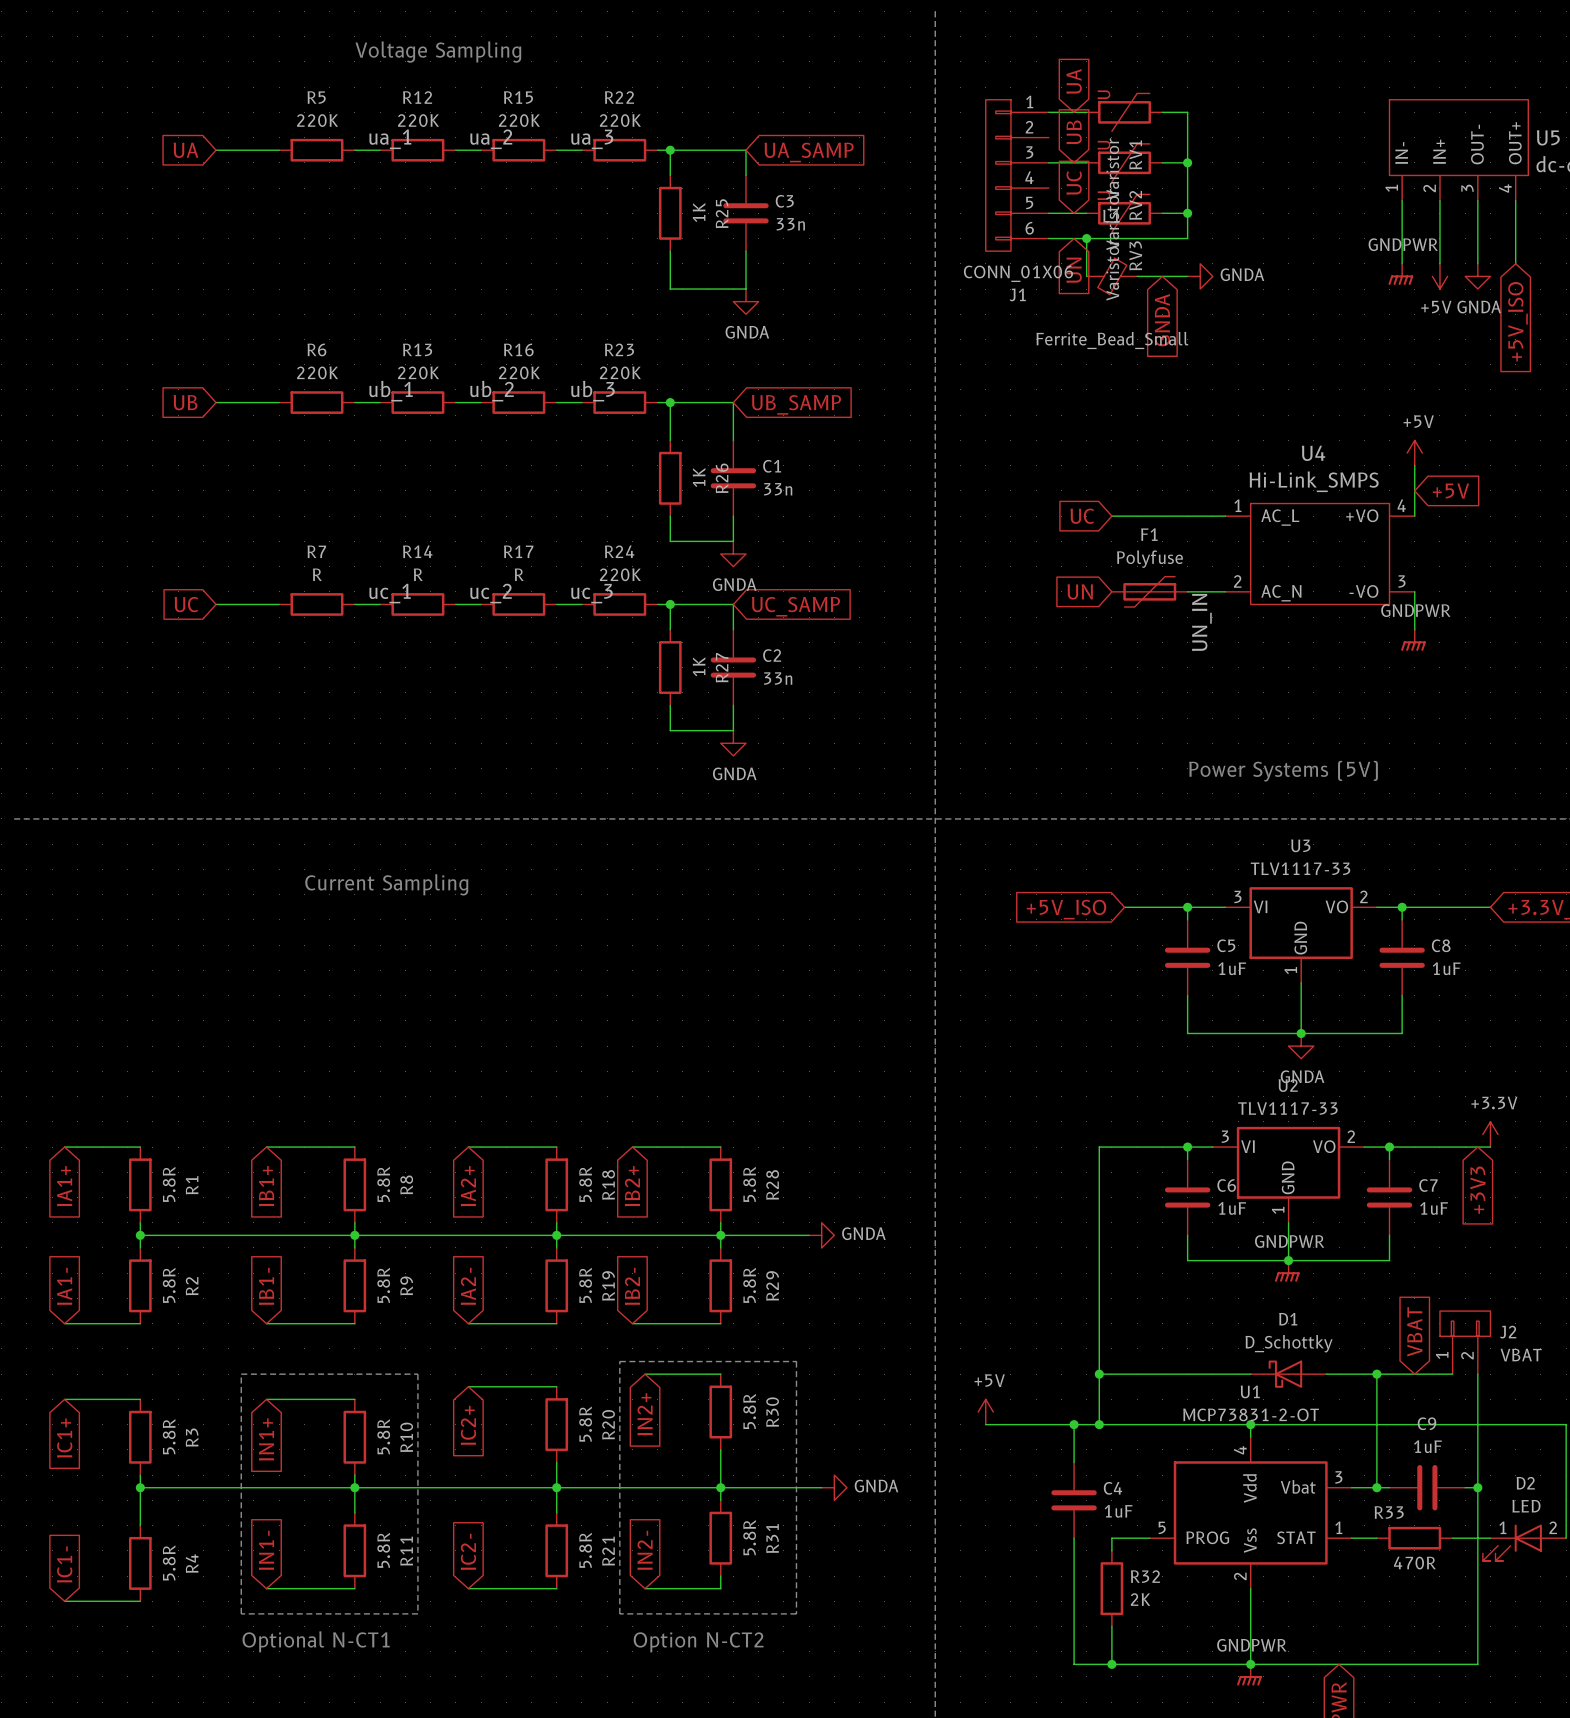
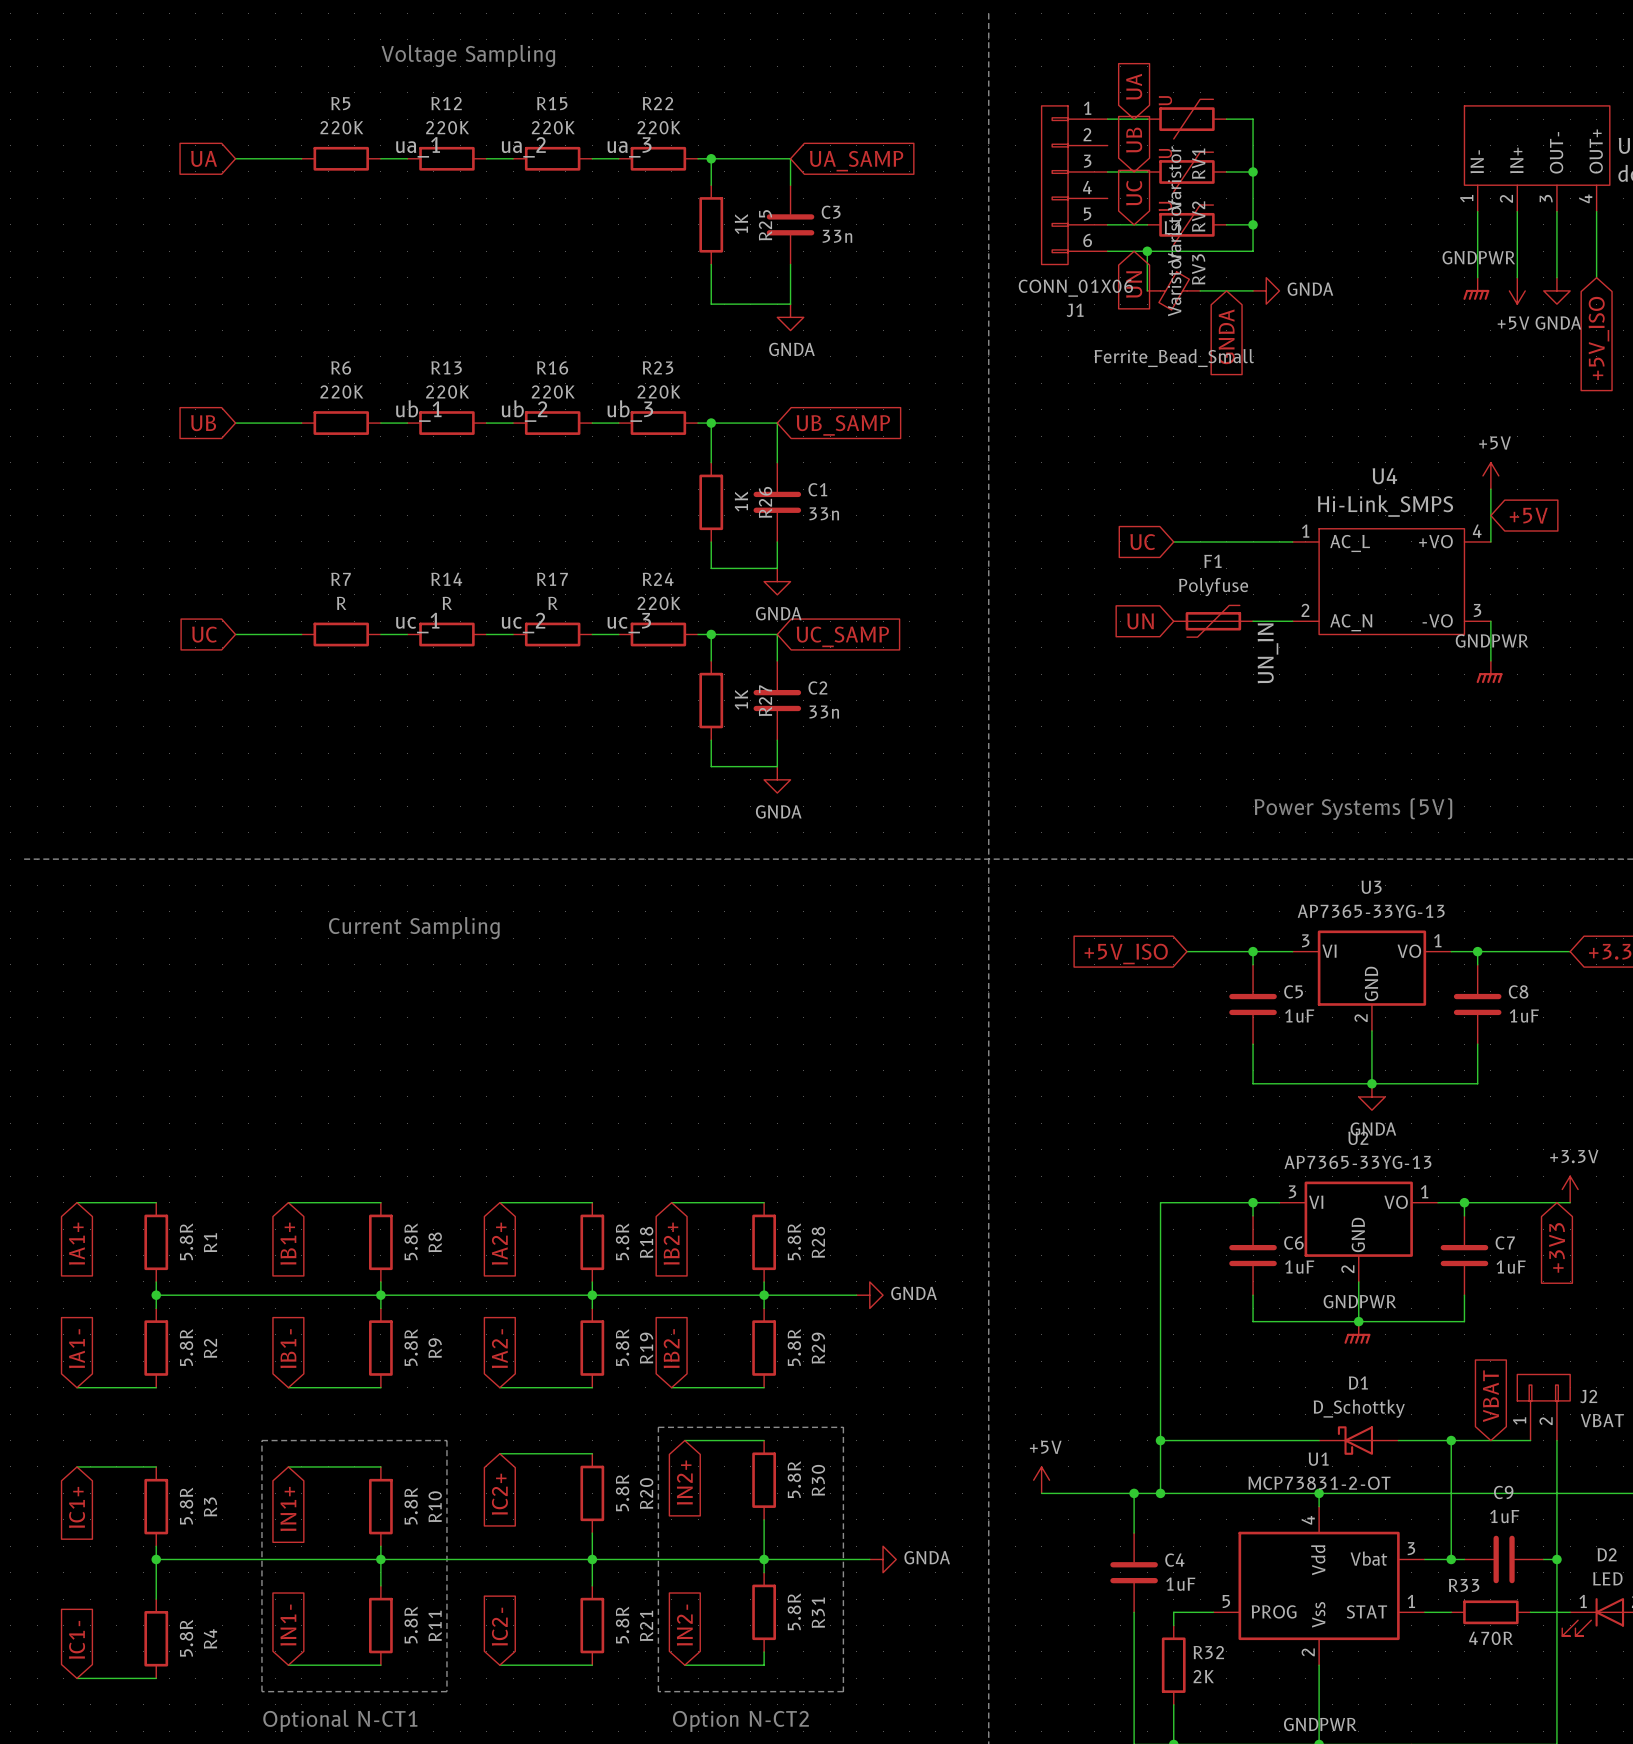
U3 value: TLV1117-33 (1300, 868) -> AP7365-33YG-13 (1371, 911)
U3 pin number: 2 (1363, 896) -> 1 (1437, 940)
U3 pin number: 1 (1290, 970) -> 2 (1361, 1018)
U2 value: TLV1117-33 (1287, 1108) -> AP7365-33YG-13 (1357, 1162)
U2 pin number: 2 (1351, 1136) -> 1 (1424, 1191)
U2 pin number: 1 (1278, 1210) -> 2 (1347, 1269)

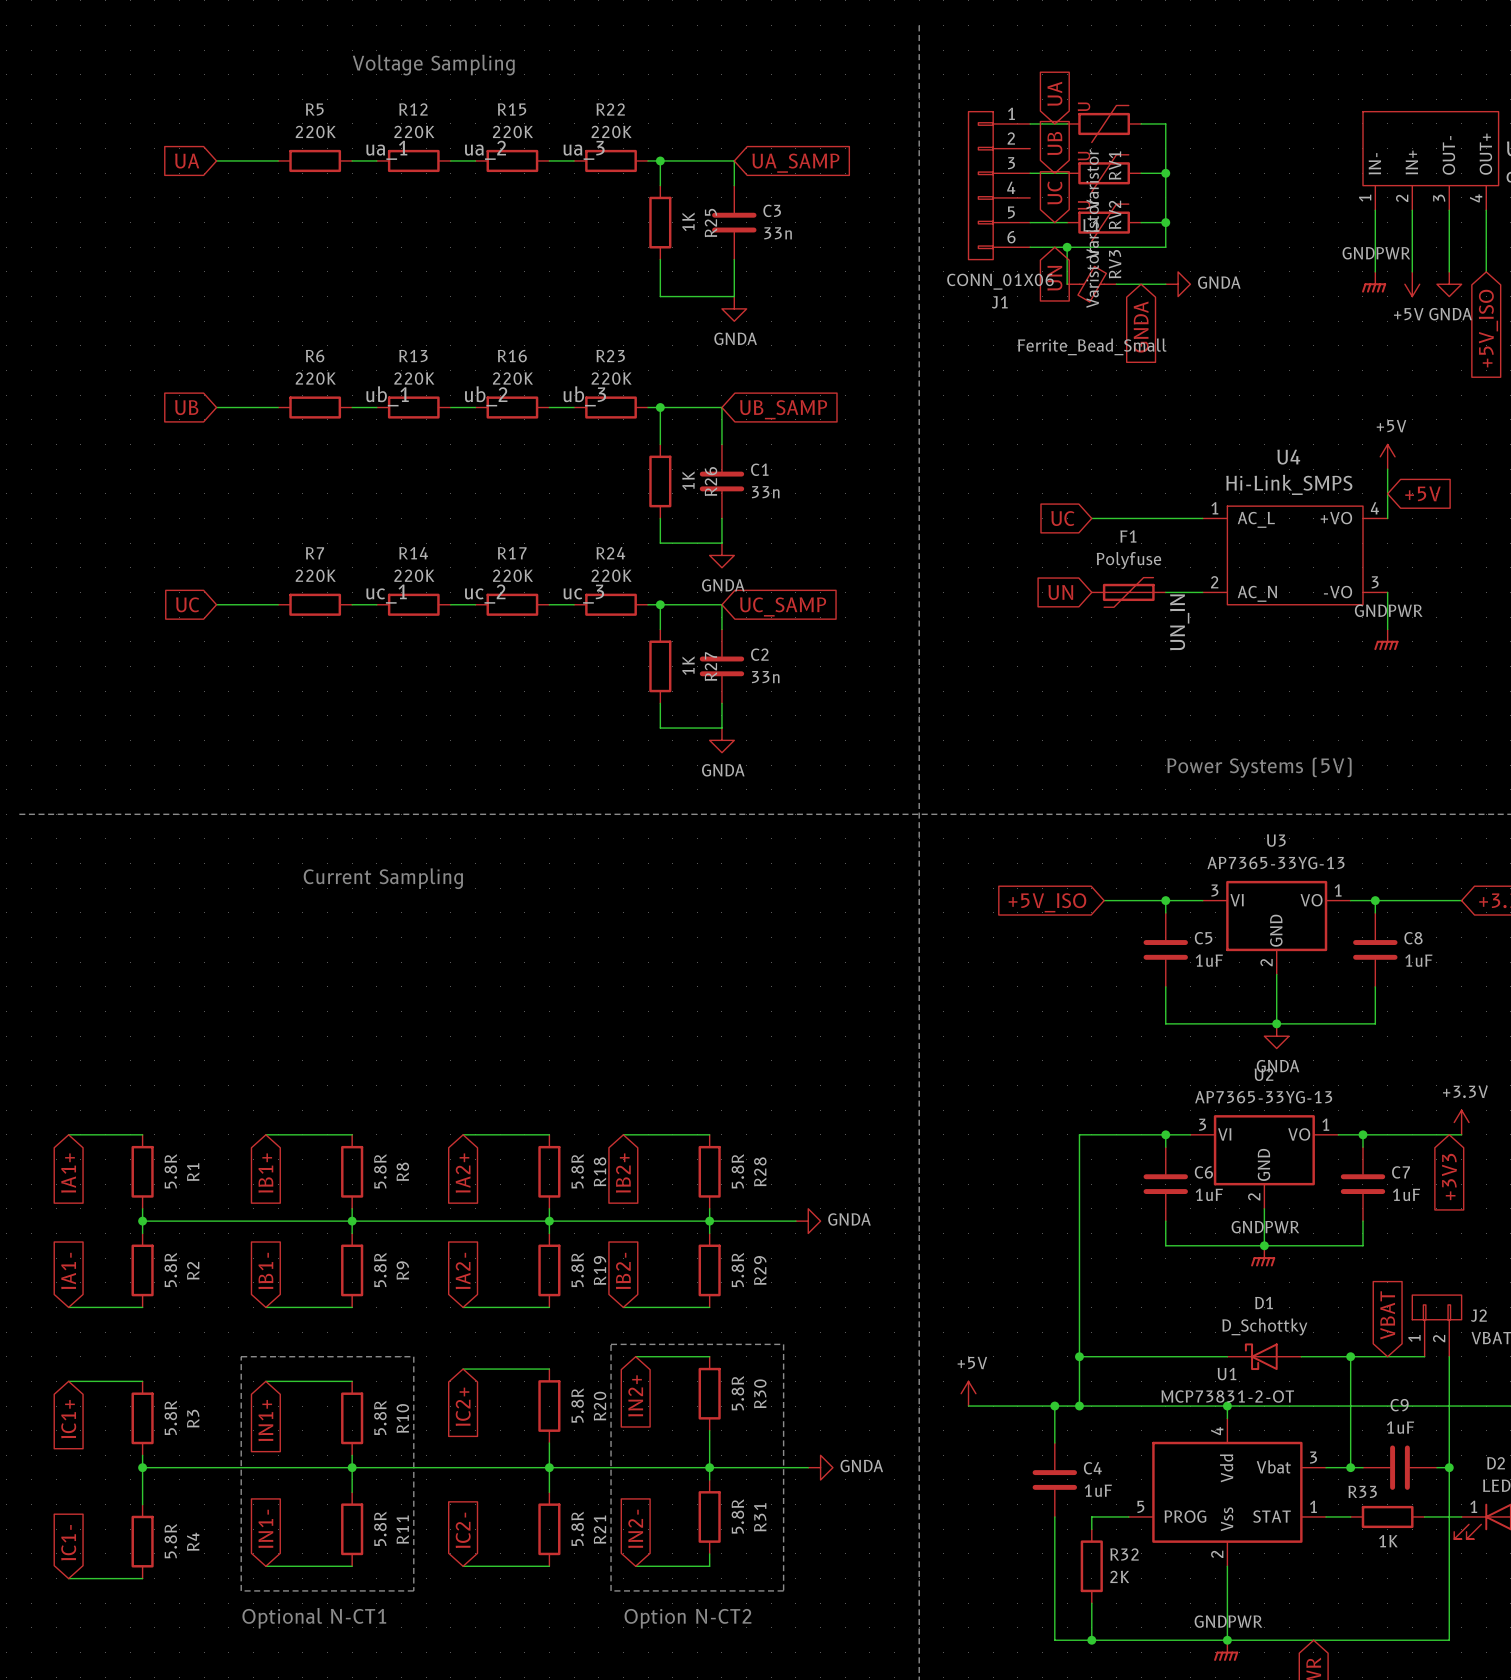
R7 value: R (341, 603) -> 220K (315, 575)
R14 value: R (447, 603) -> 220K (414, 575)
R17 value: R (553, 603) -> 220K (512, 575)
R33 value: 470R (1491, 1638) -> 1K (1388, 1541)

